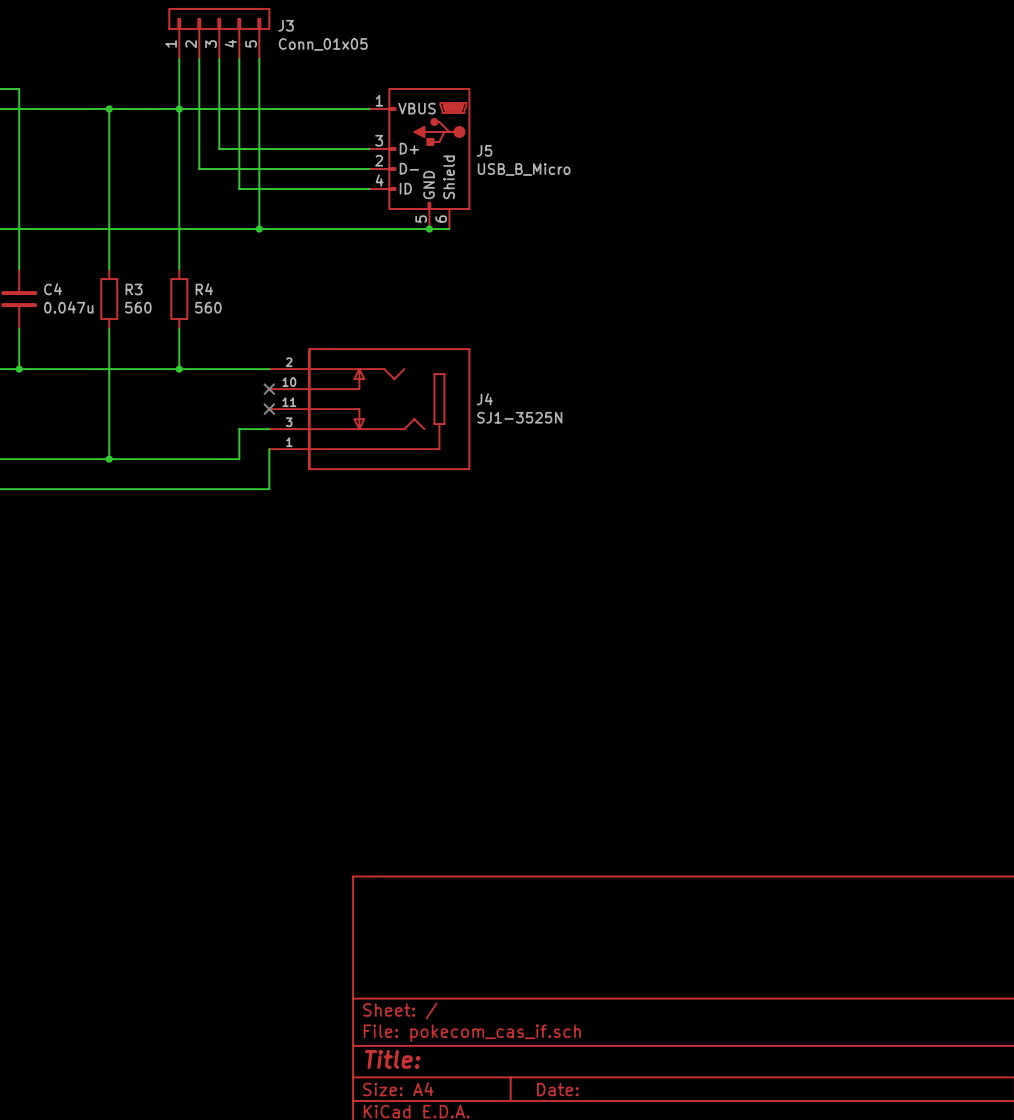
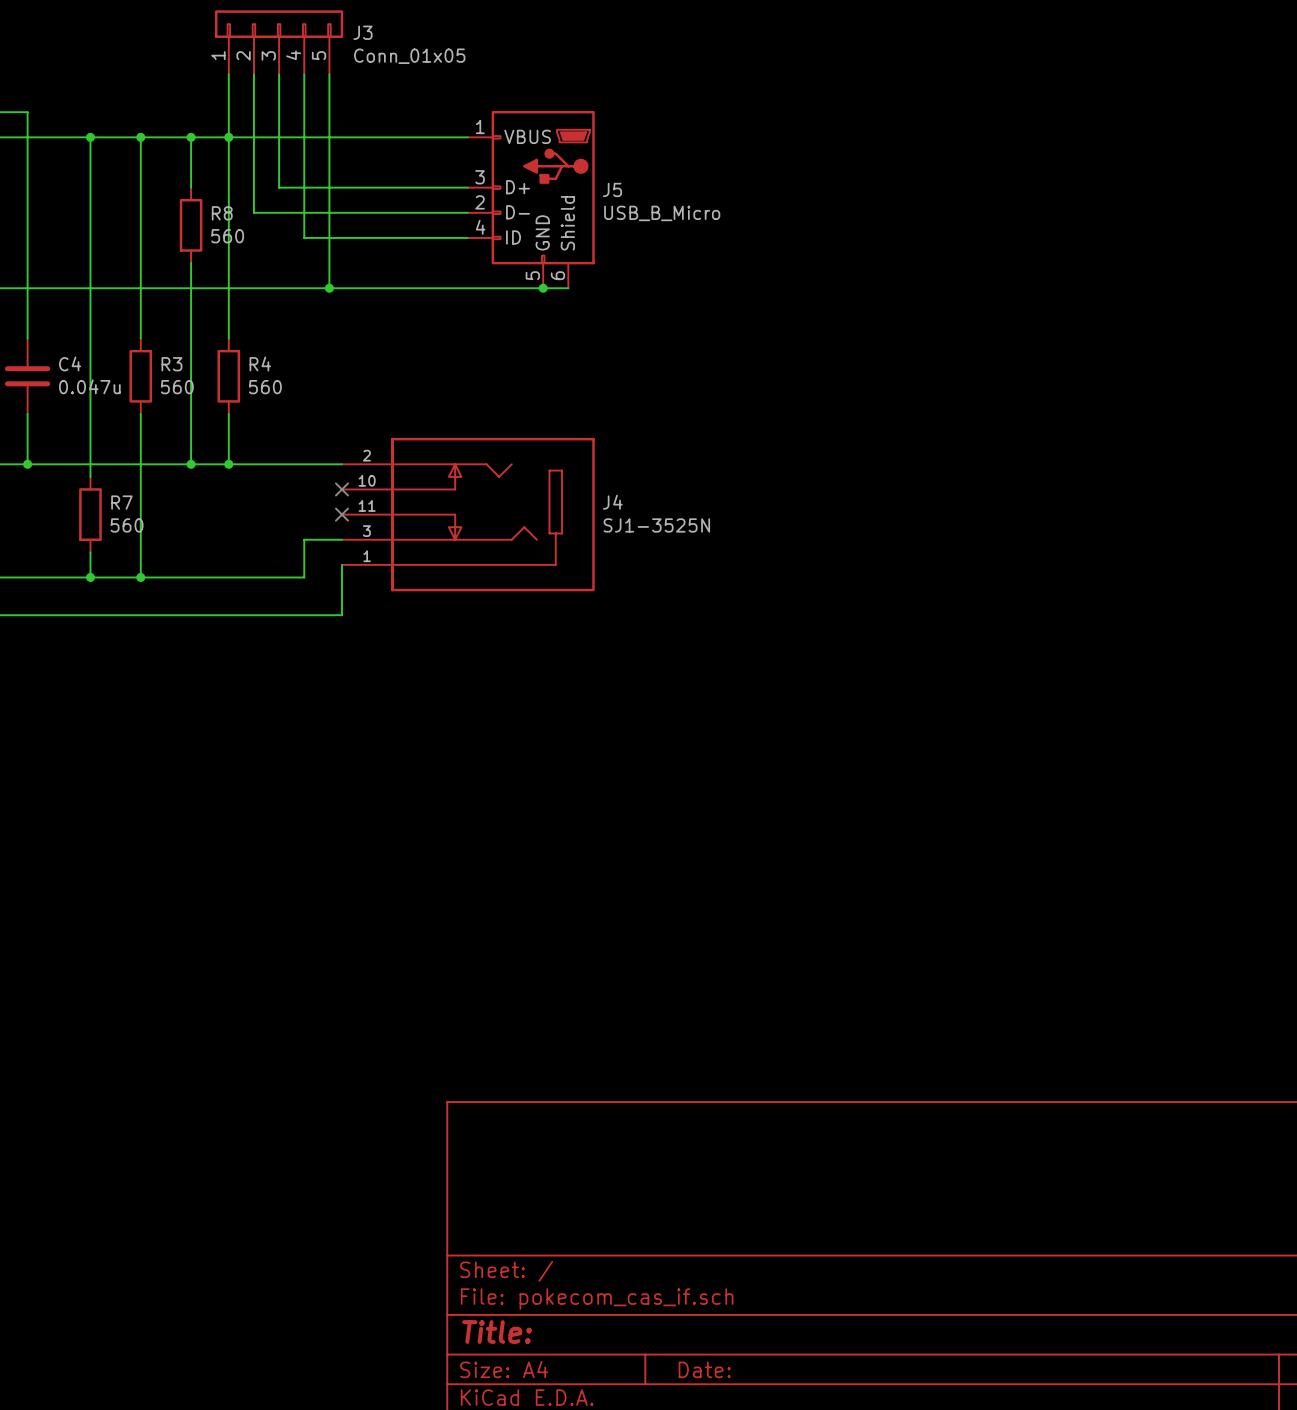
wire: none -> (90, 137) (90, 476)
junction: none -> (90, 137)
wire: none -> (191, 137) (191, 187)
junction: none -> (191, 137)
R8: none -> 560 (191, 225)
wire: none -> (191, 263) (191, 464)
junction: none -> (191, 464)
R7: none -> 560 (90, 514)
wire: none -> (90, 552) (90, 577)
junction: none -> (90, 577)

